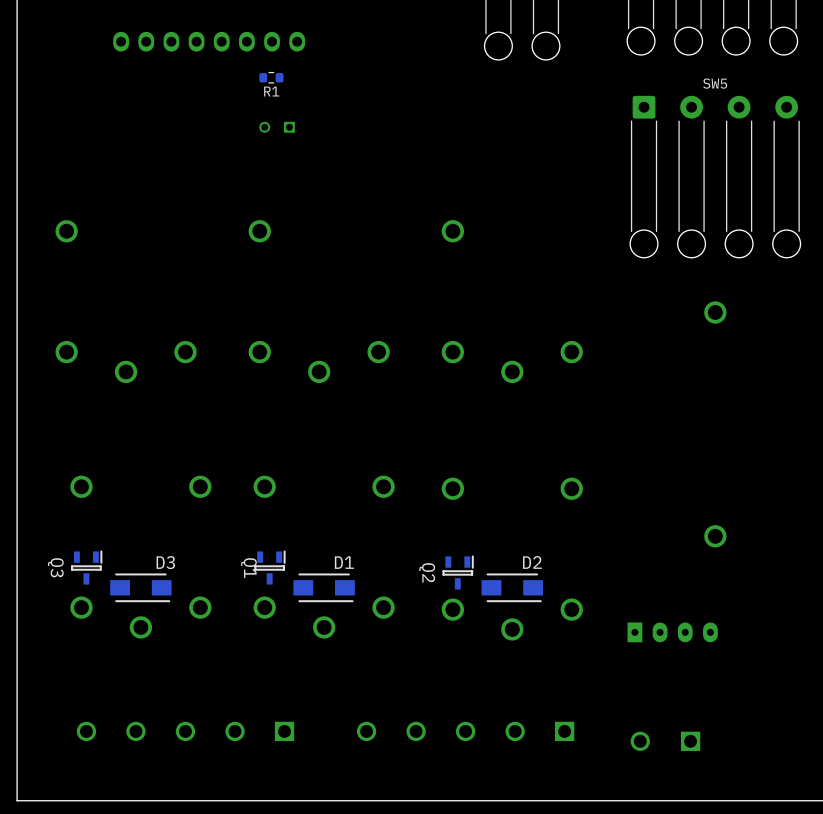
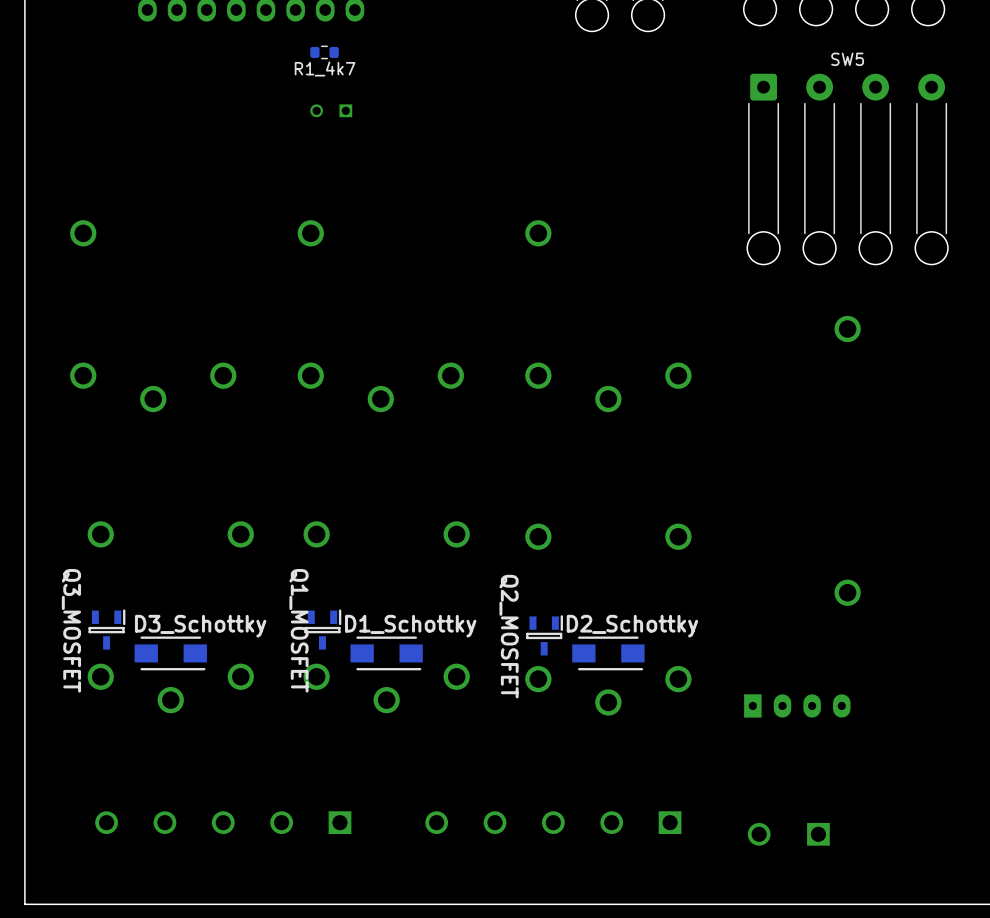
R1 name: R1 (271, 91) -> R1_4k7 (325, 68)
D3 name: D3 (165, 562) -> D3_Schottky (200, 626)
D1 name: D1 (344, 562) -> D1_Schottky (410, 626)
D2 name: D2 (532, 562) -> D2_Schottky (632, 626)
Q3 name: Q3 (55, 567) -> Q3_MOSFET (71, 630)
Q1 name: Q1 (248, 568) -> Q1_MOSFET (298, 630)
Q2 name: Q2 (427, 572) -> Q2_MOSFET (509, 636)

